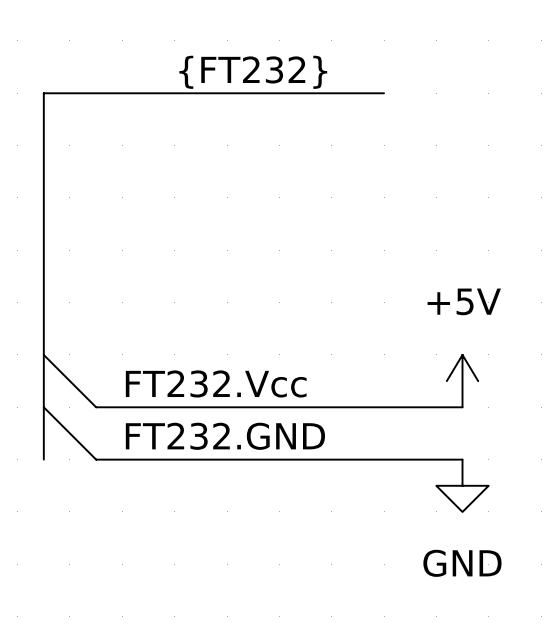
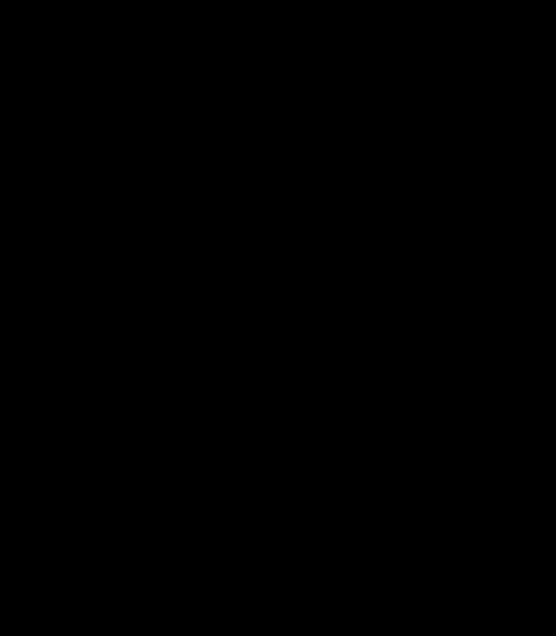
label: {FT232} (253, 72) -> none
bus: (384, 93) (43, 93) (43, 459) -> none
wire: (43, 354) (96, 407) (462, 407) -> none
power symbol: +5V (462, 381) -> none
label: FT232.Vcc (216, 383) -> none
wire: (43, 407) (96, 459) (462, 459) -> none
label: FT232.GND (225, 436) -> none
power symbol: GND (462, 485) -> none

